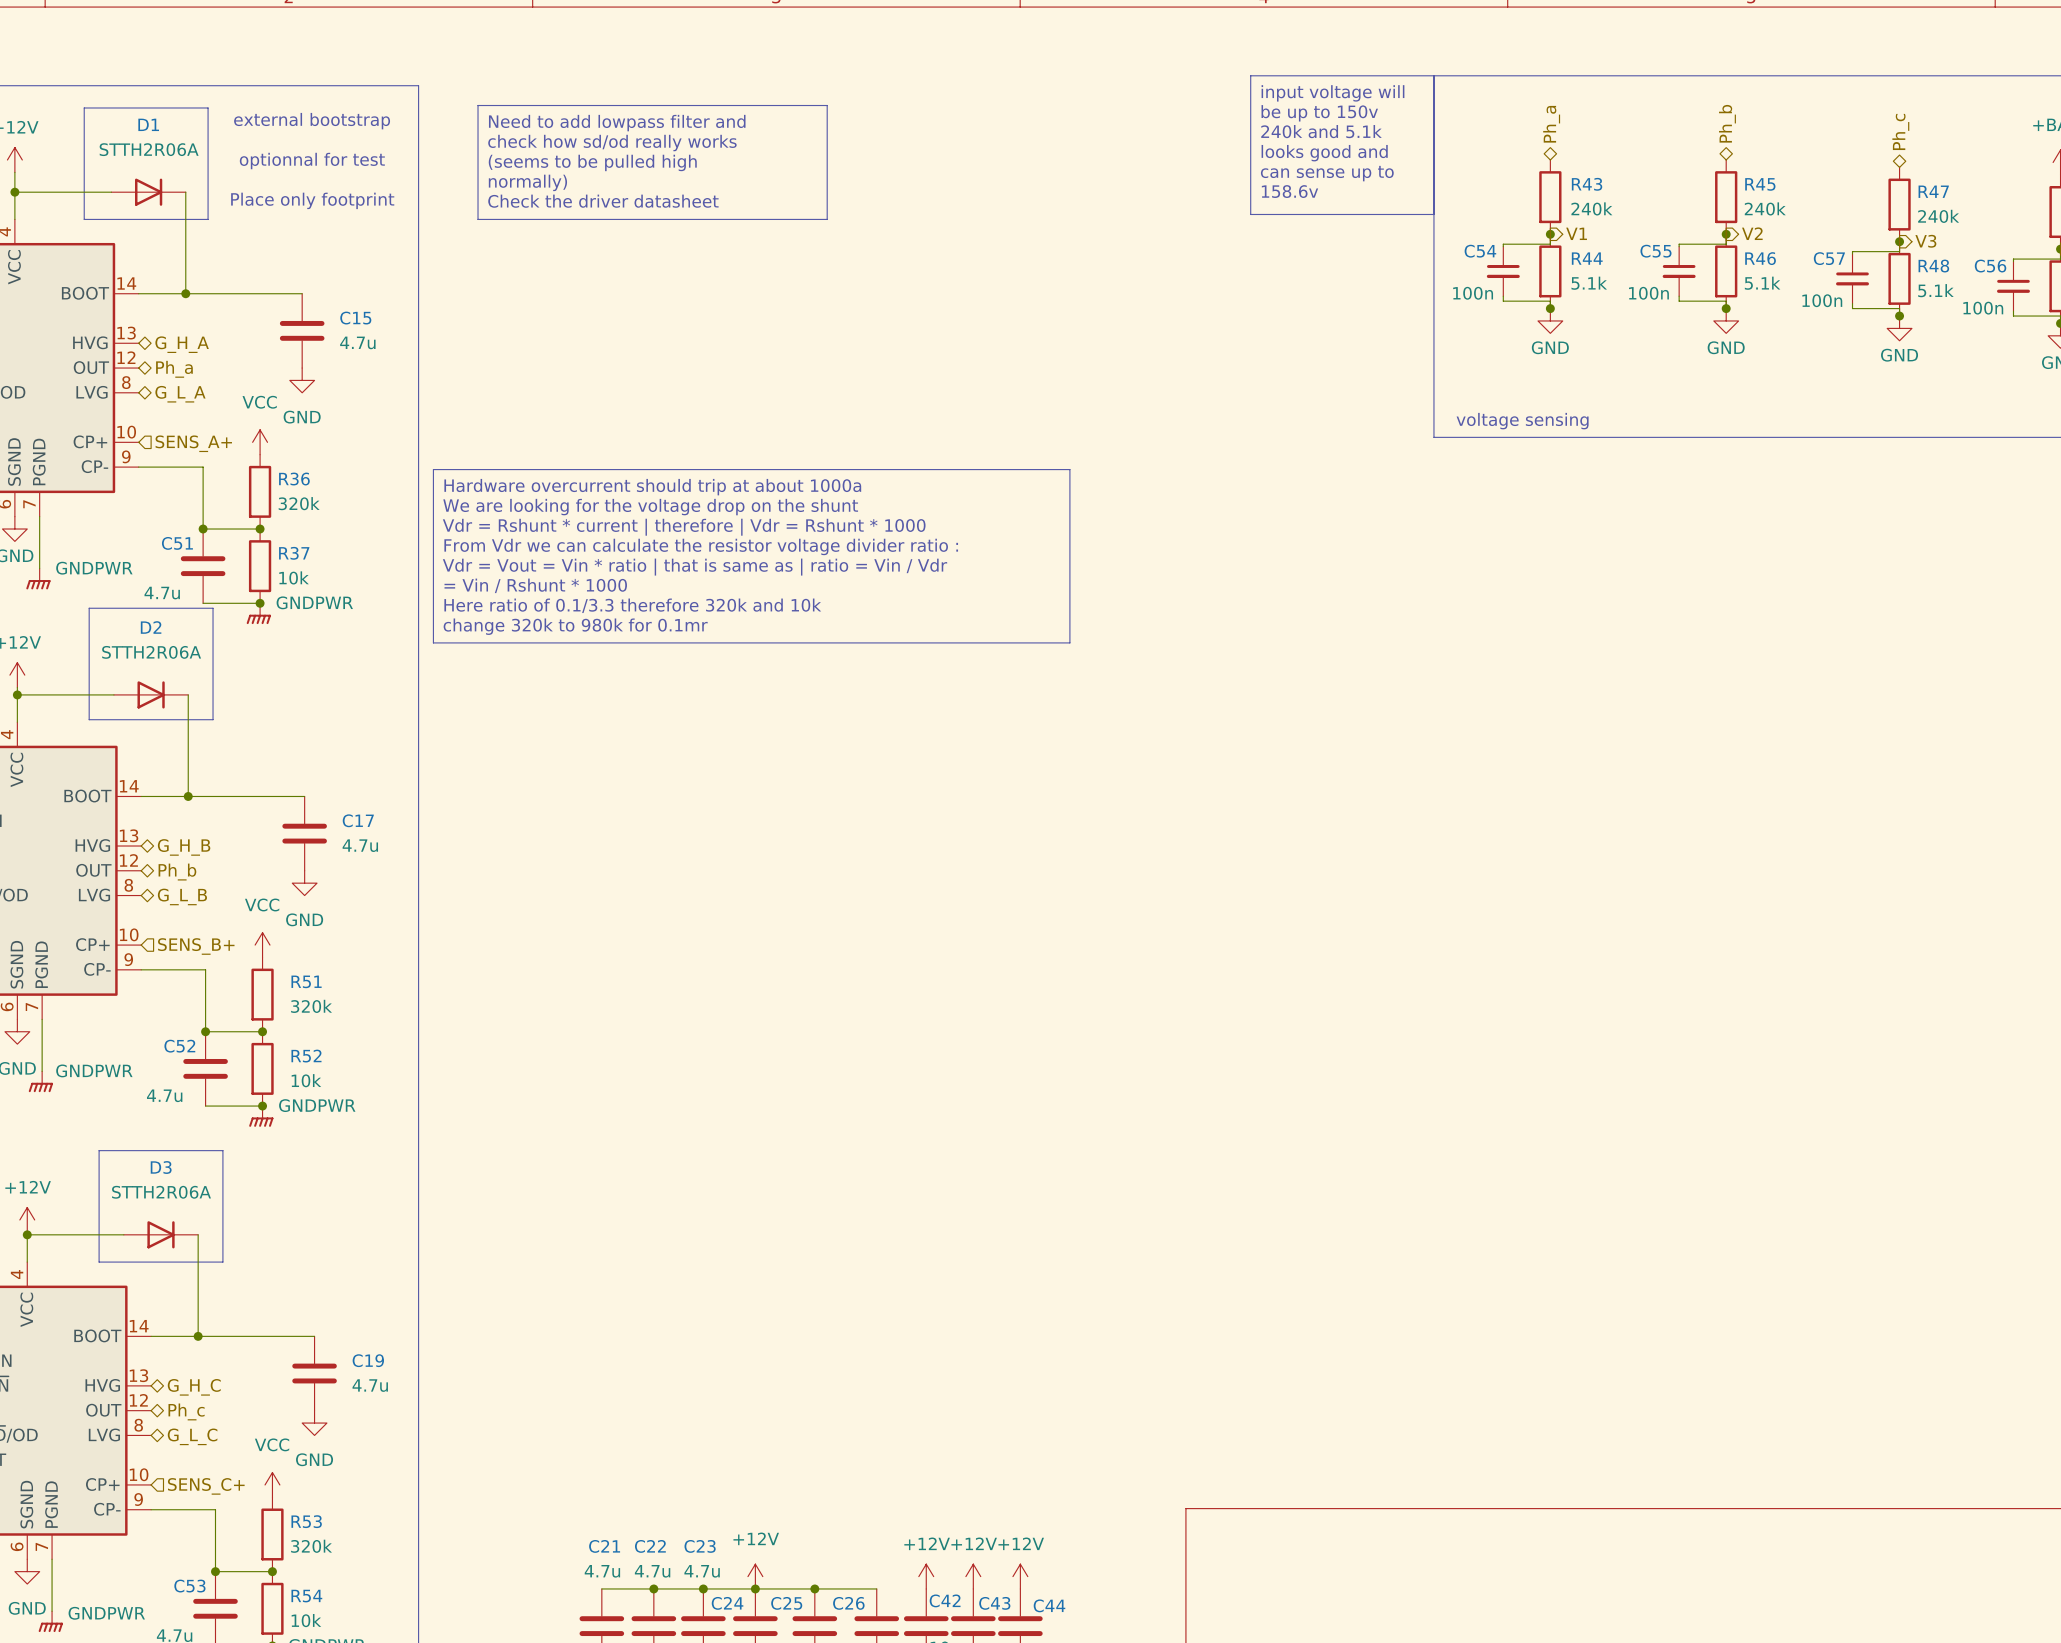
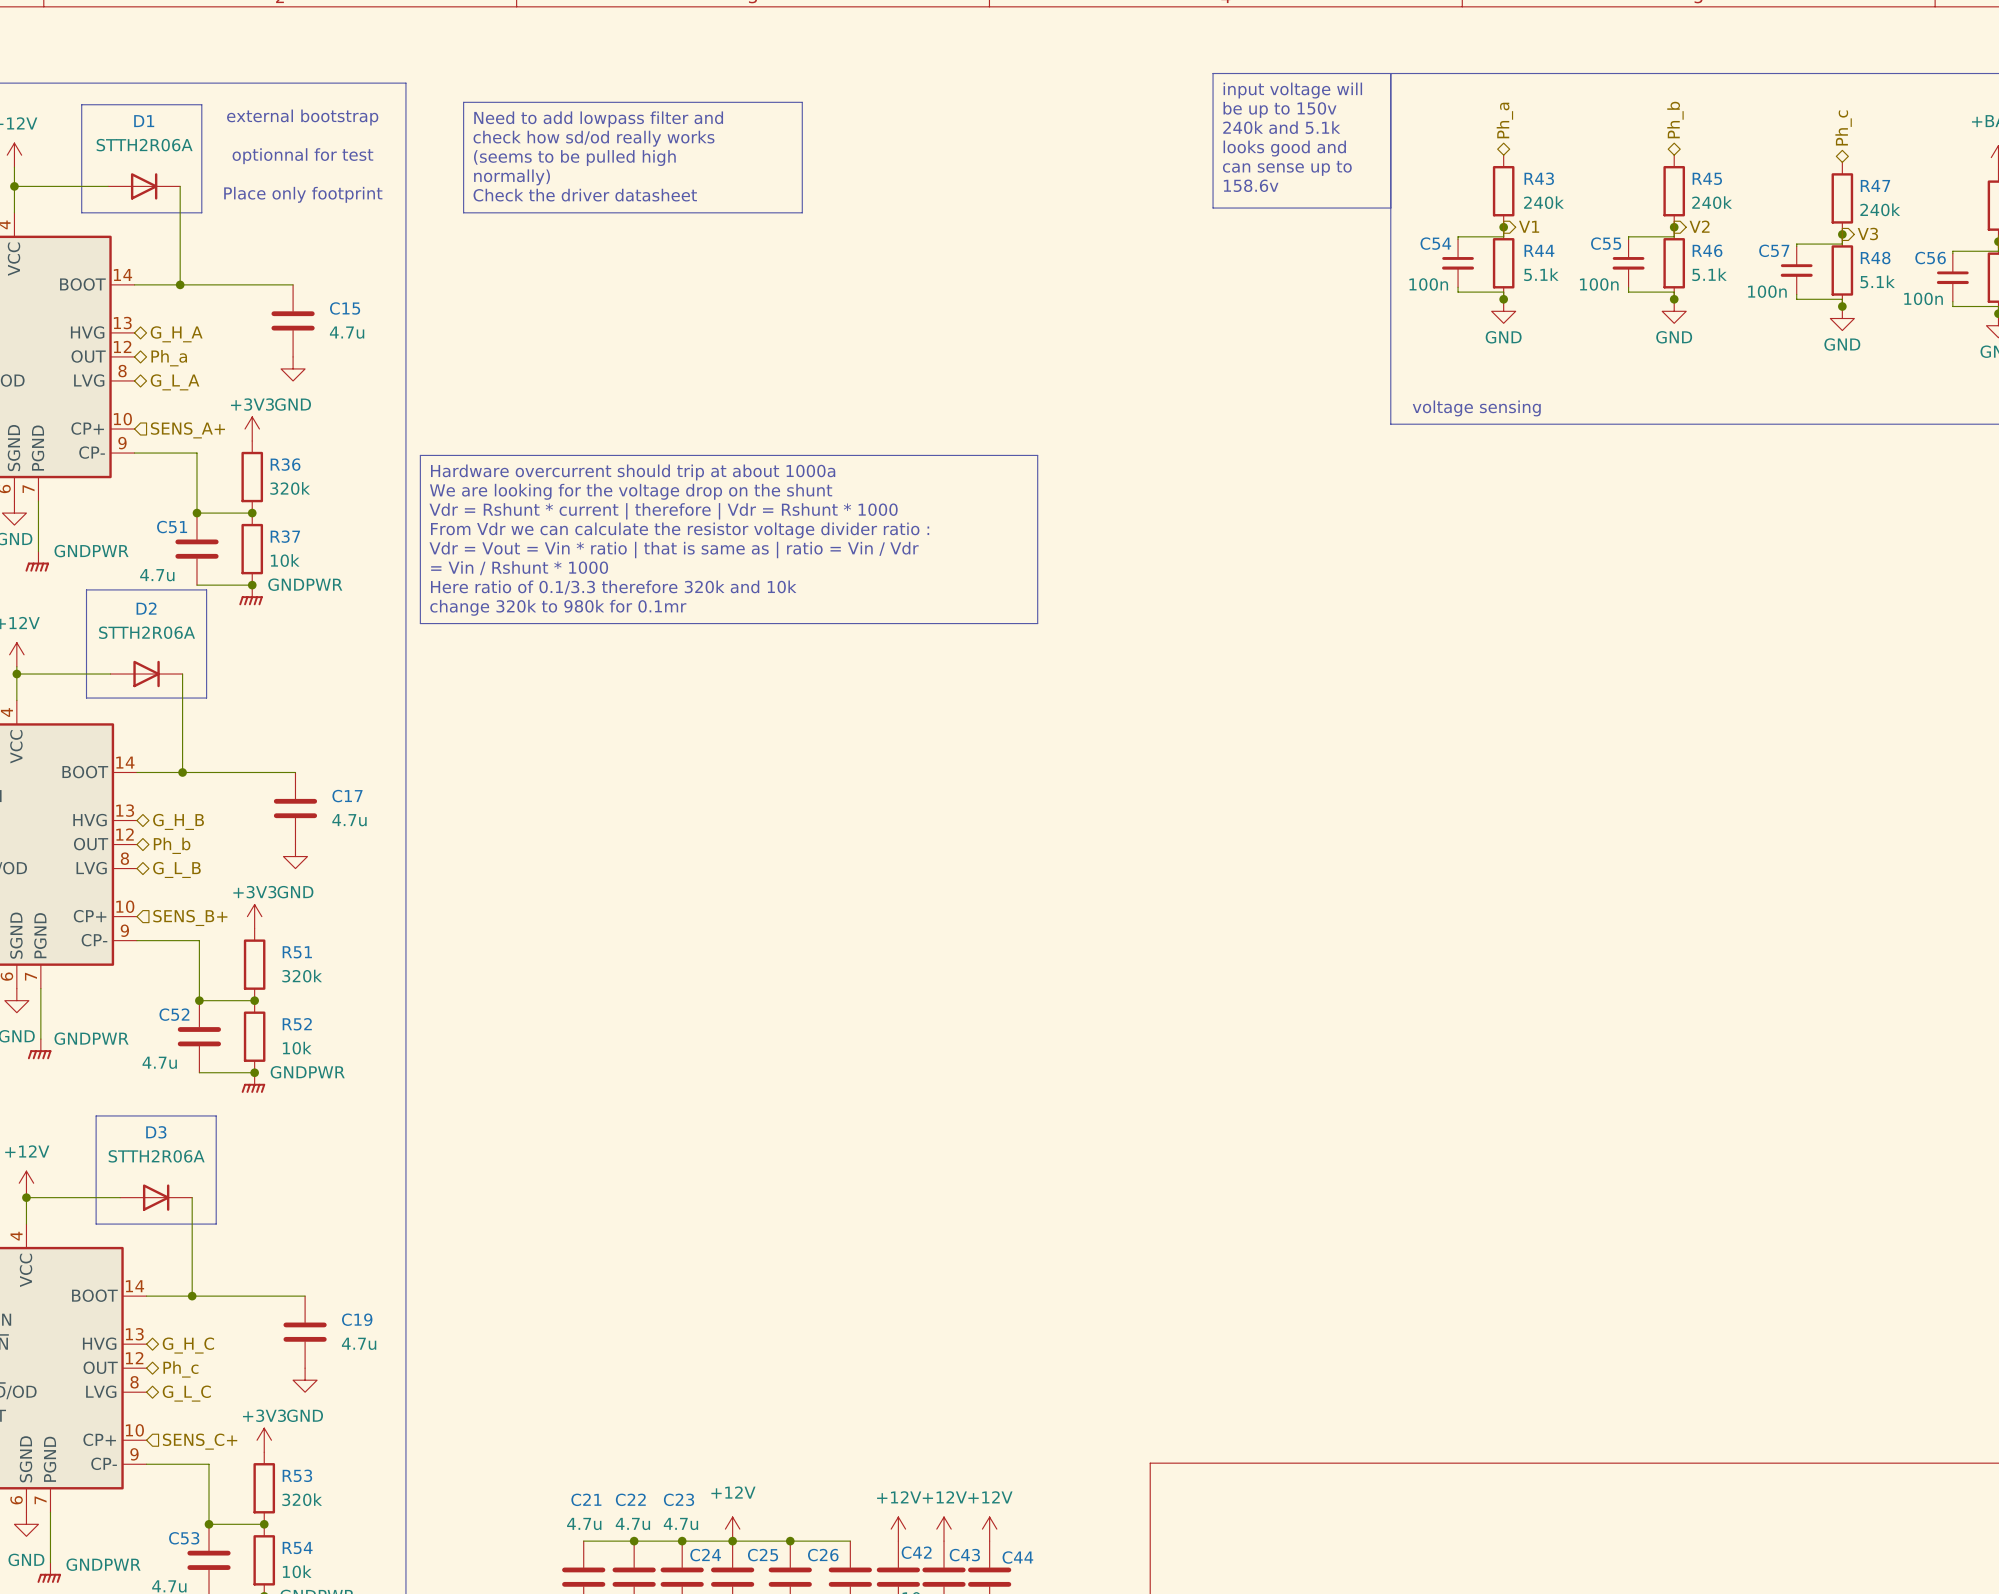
power symbol: VCC (260, 442) -> +3V3 (252, 429)
power symbol: VCC (262, 945) -> +3V3 (254, 916)
power symbol: VCC (272, 1484) -> +3V3 (264, 1440)

